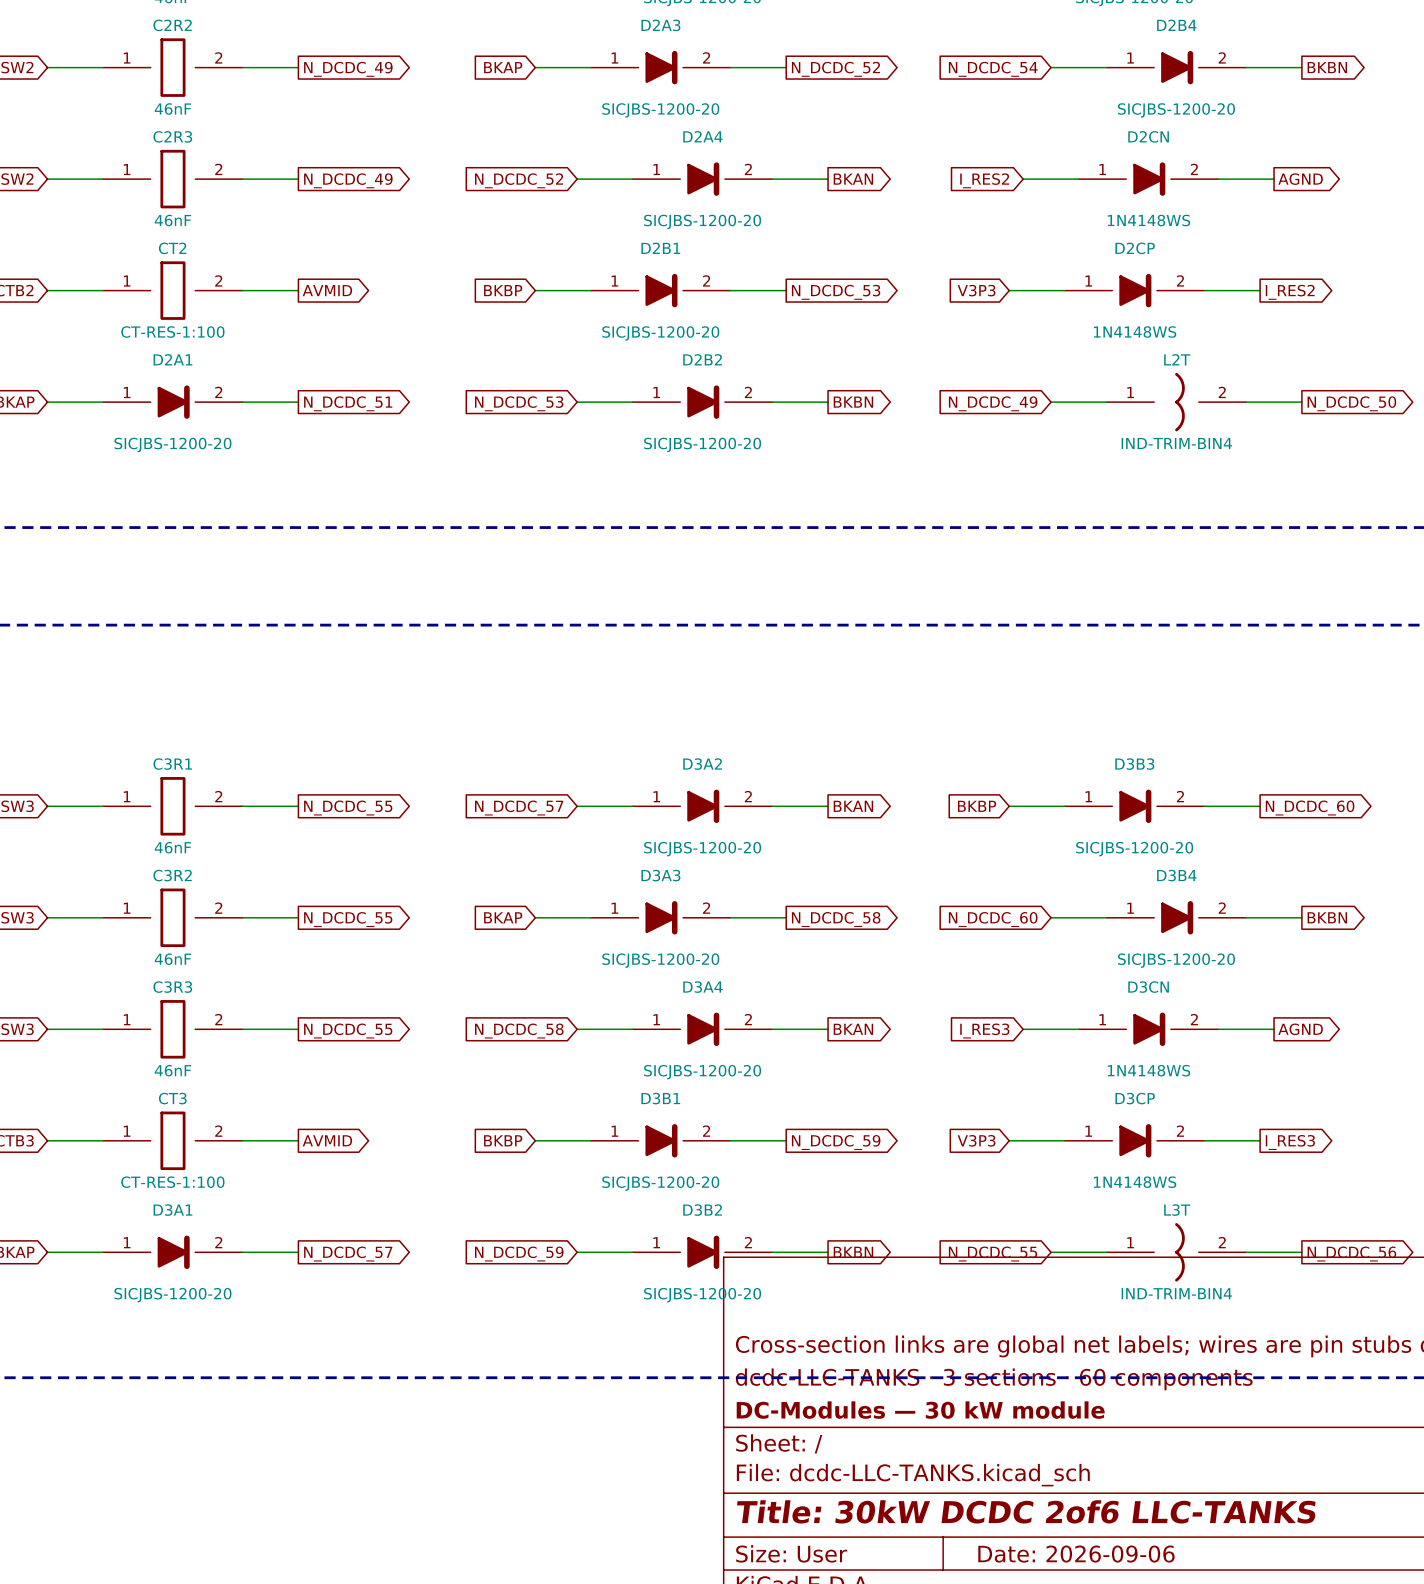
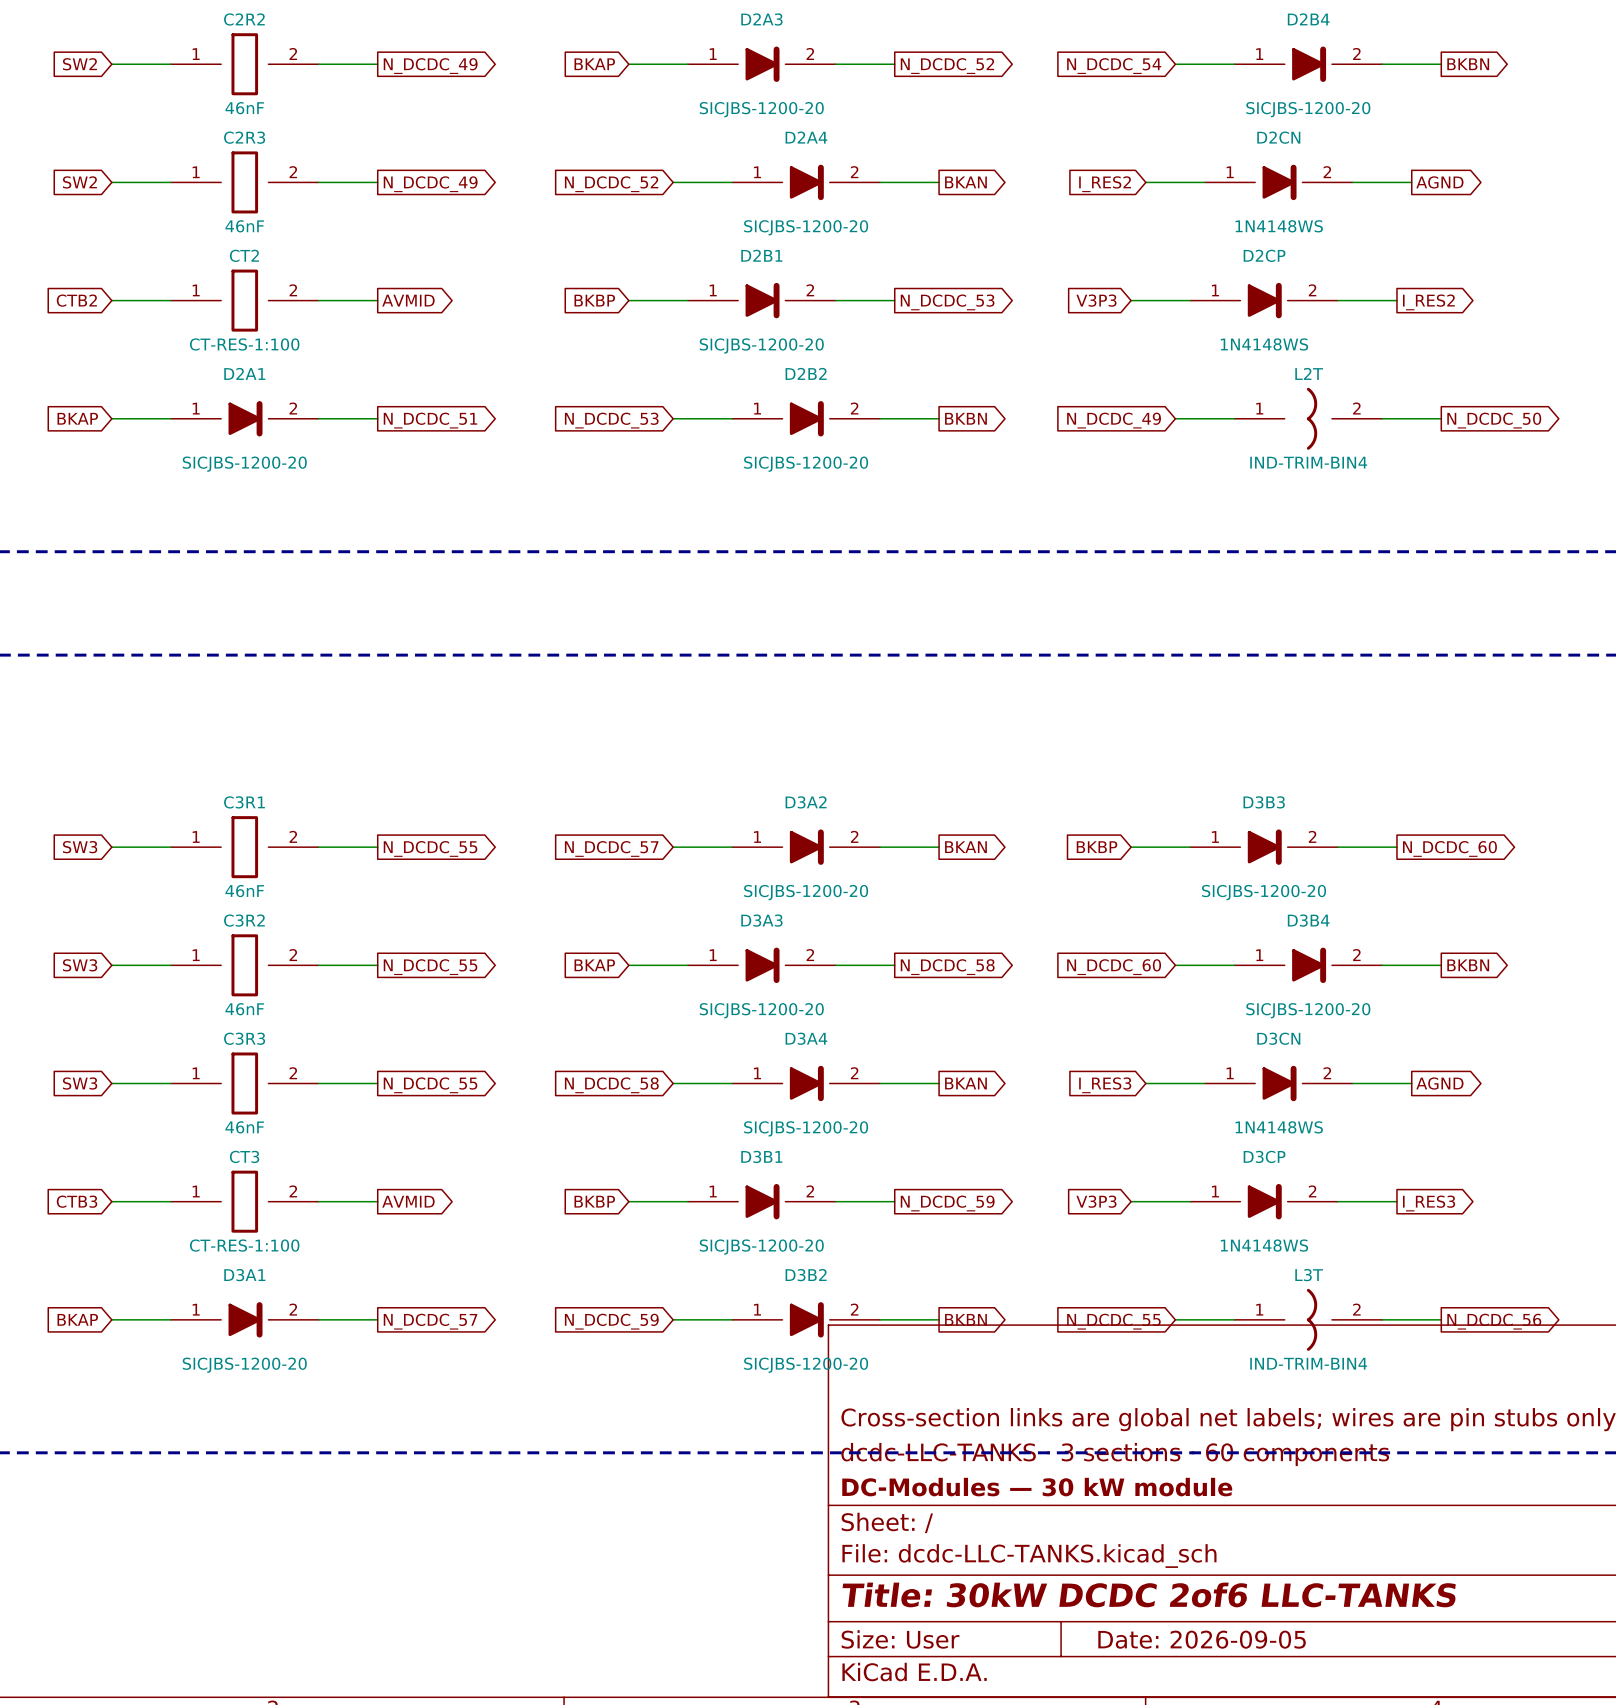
title block: Date: 2026-09-06 (1076, 1554) -> Date: 2026-09-05 (1202, 1639)

